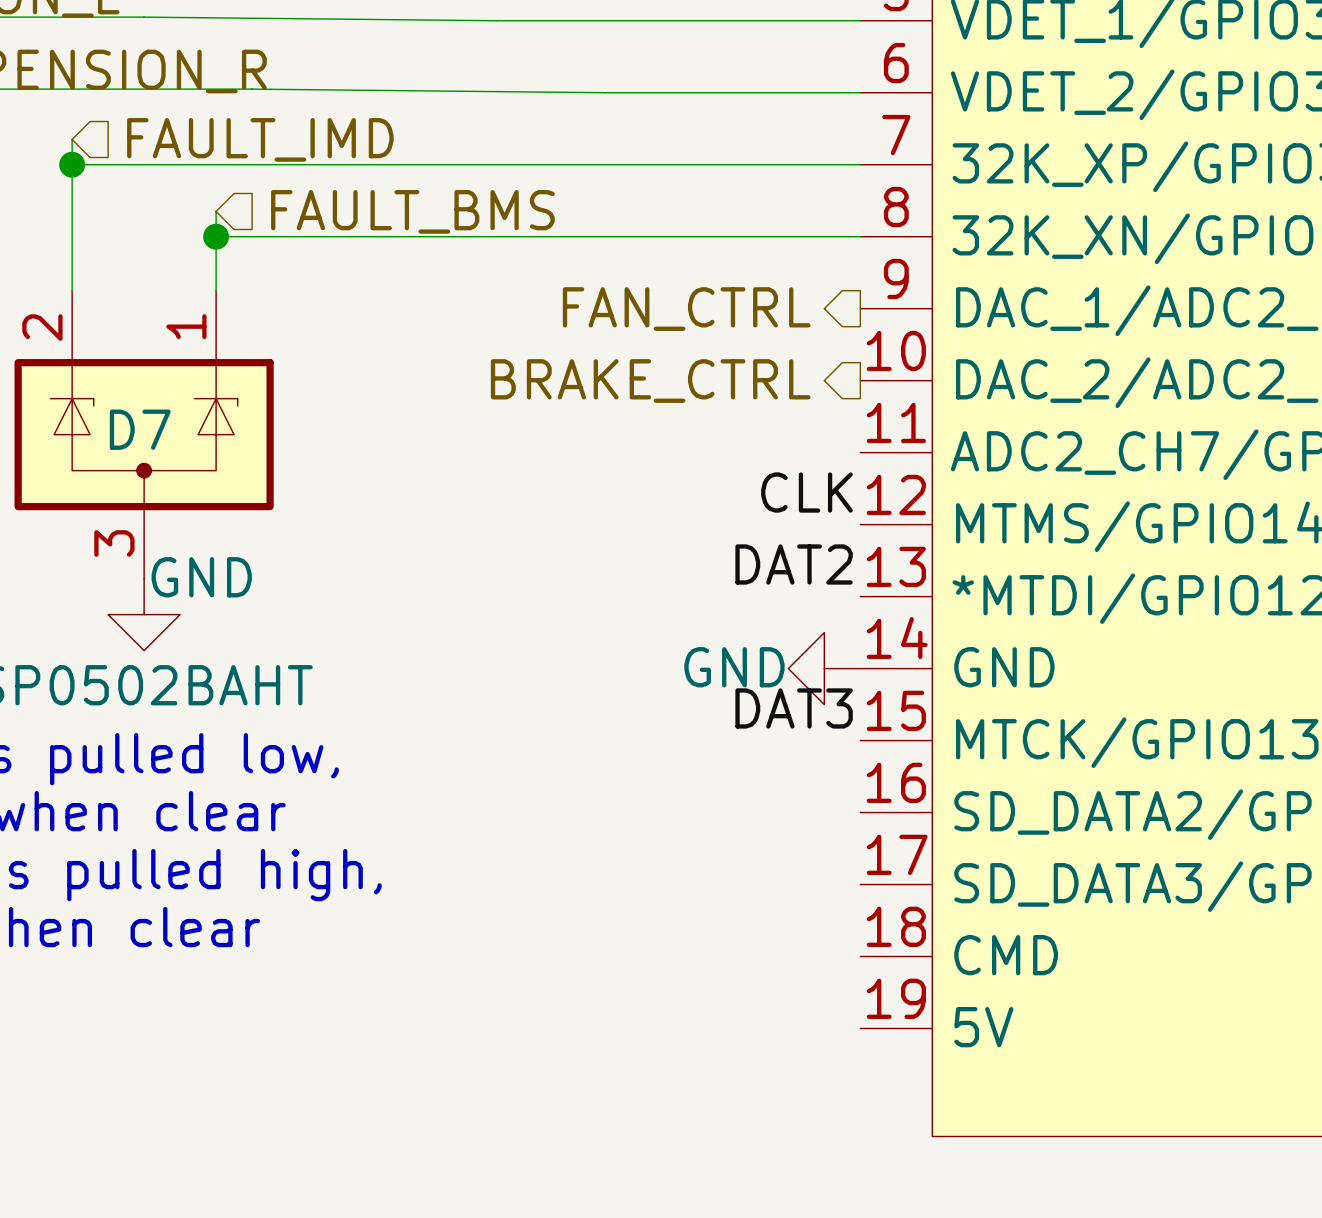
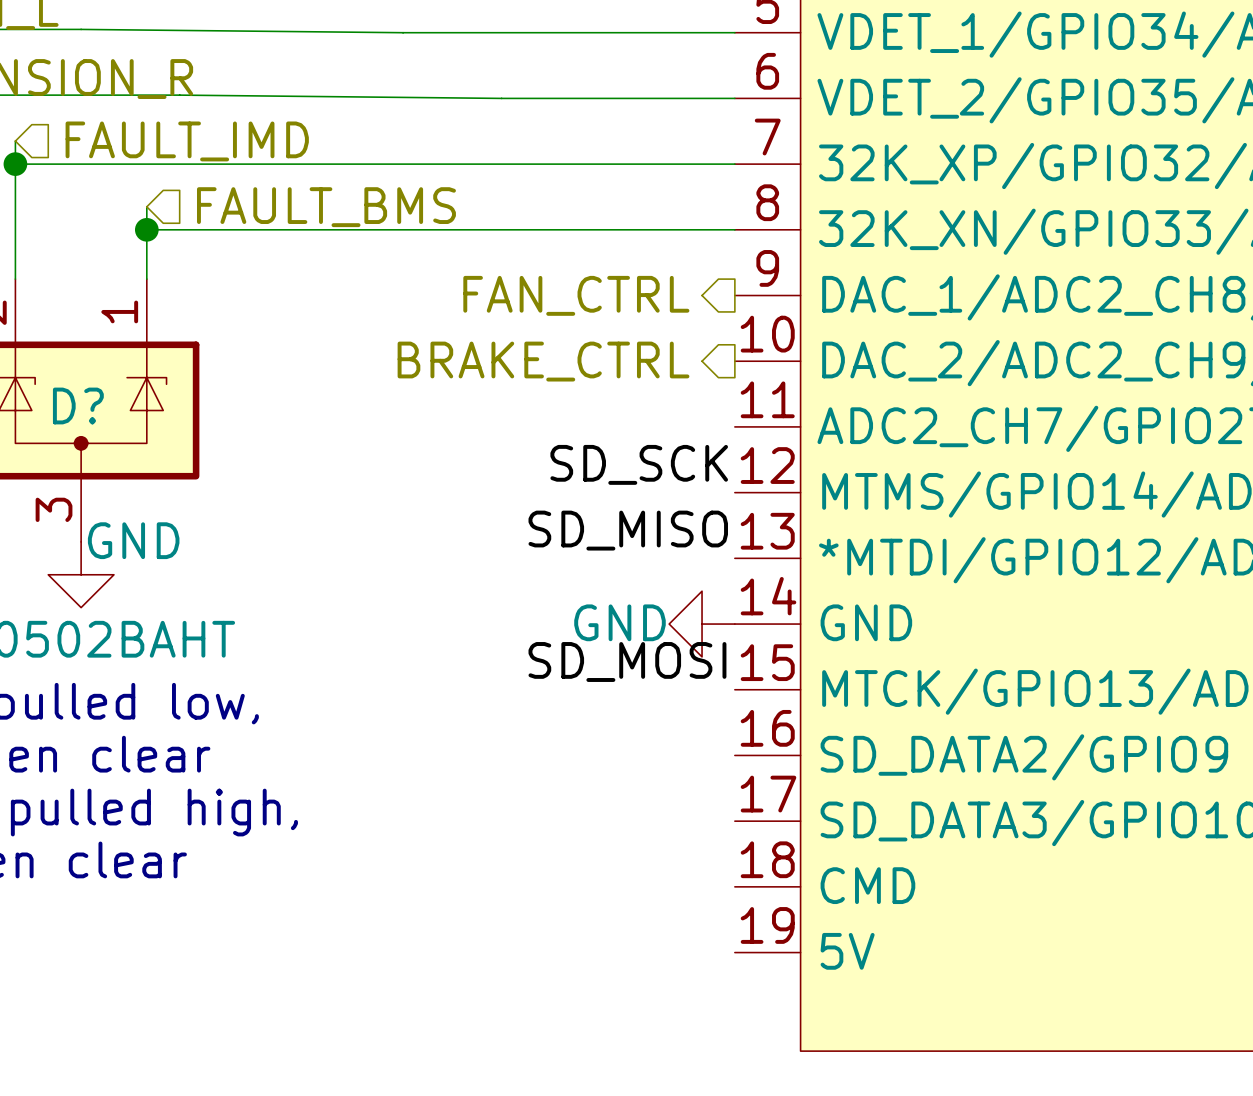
D7 name: D7 (140, 429) -> D? (78, 405)
label: CLK (806, 492) -> SD_SCK (639, 464)
label: DAT2 (794, 564) -> SD_MISO (628, 530)
label: DAT3 (794, 708) -> SD_MOSI (627, 662)

